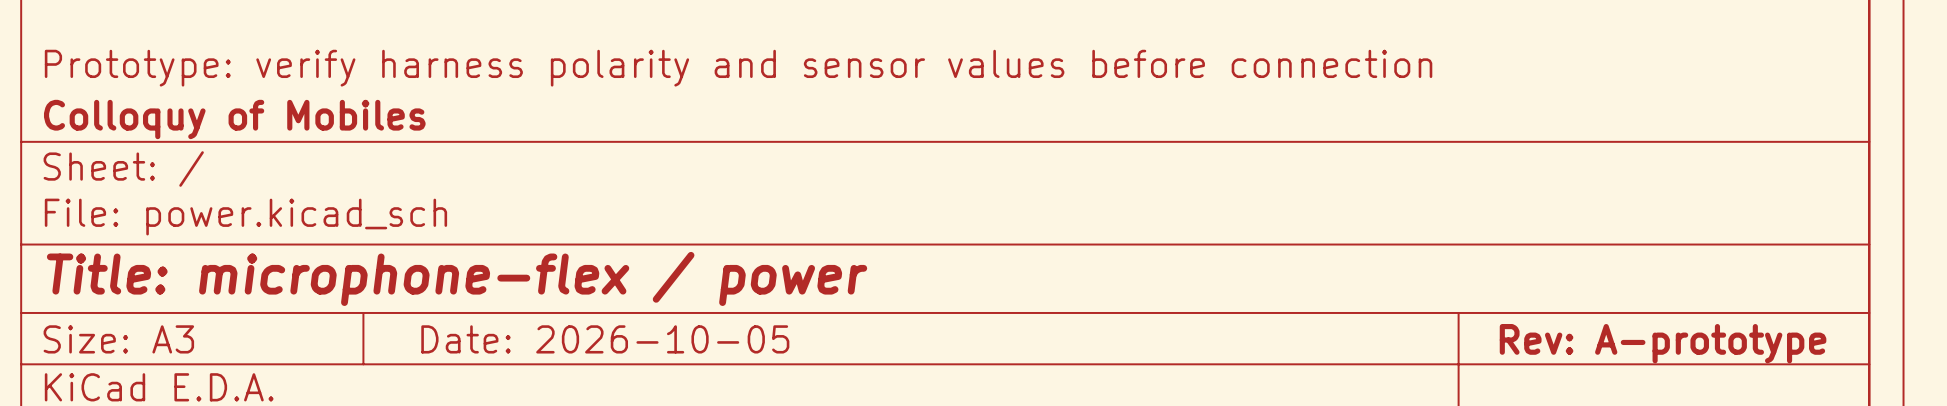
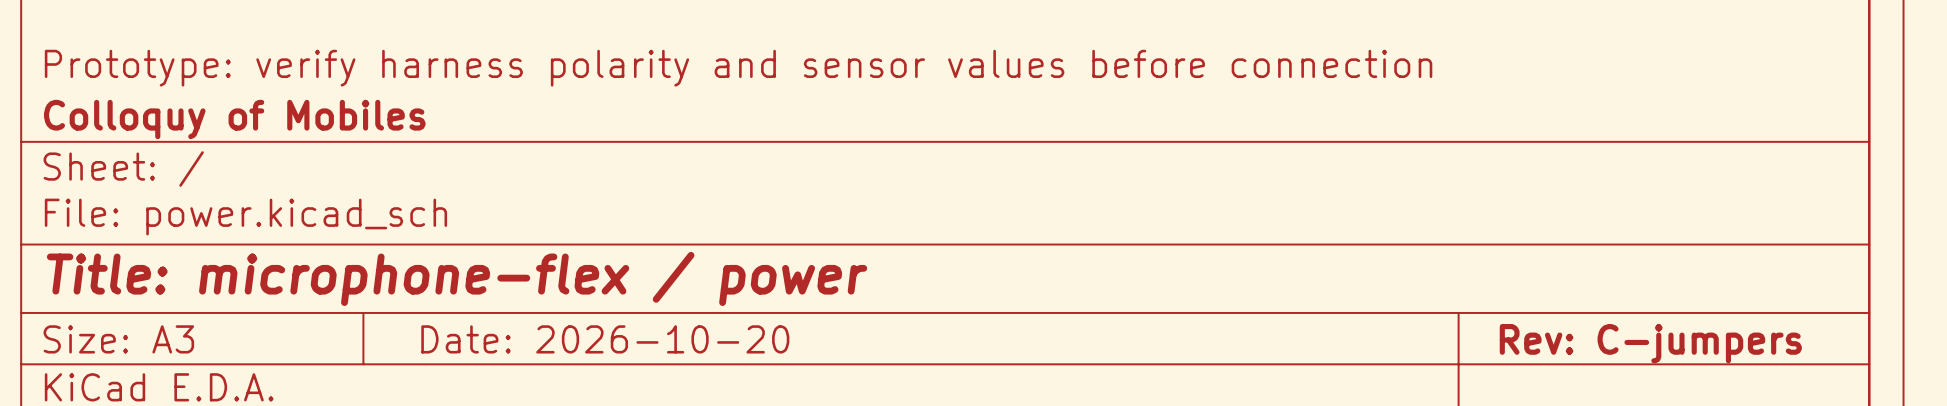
title block: Date: 2026-10-05 (605, 339) -> Date: 2026-10-20 (605, 339)
title block: Rev: A-prototype (1663, 343) -> Rev: C-jumpers (1650, 343)

